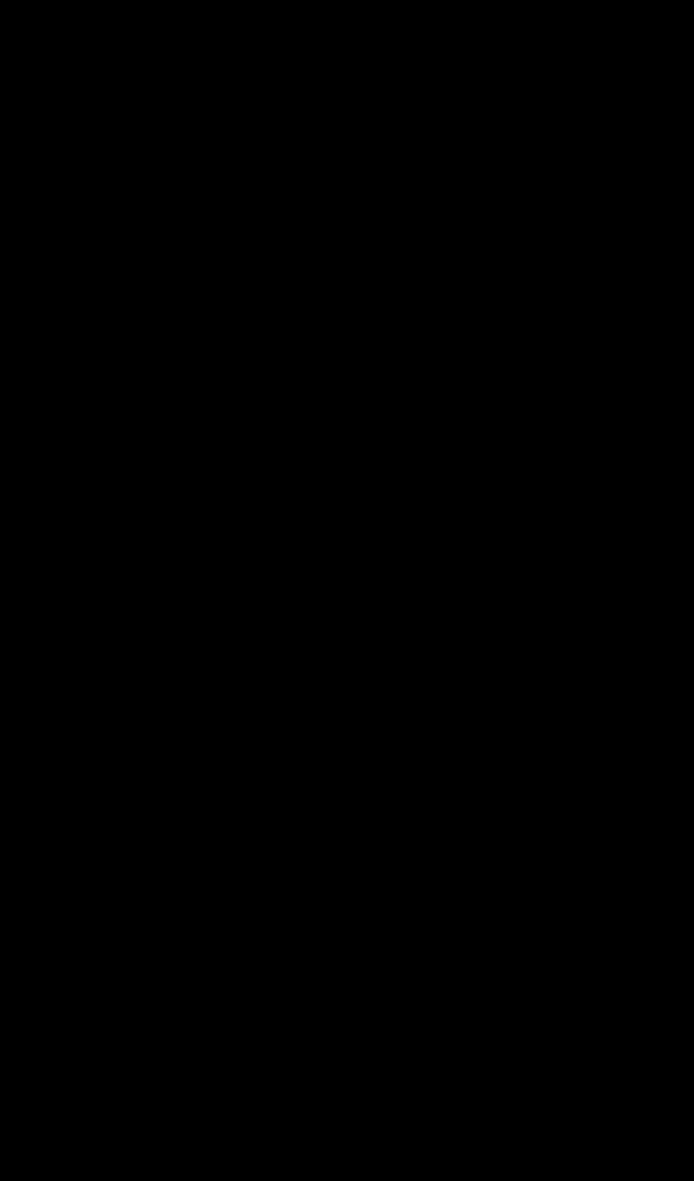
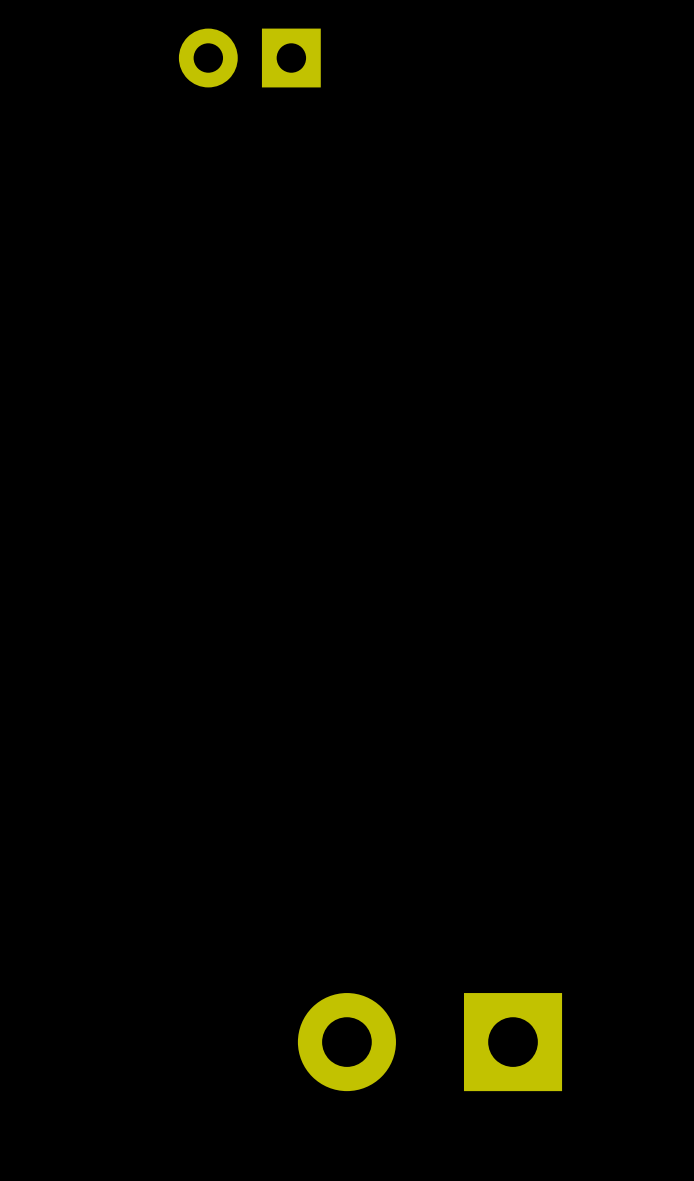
part: none -> (249, 58)
part: none -> (429, 1042)

